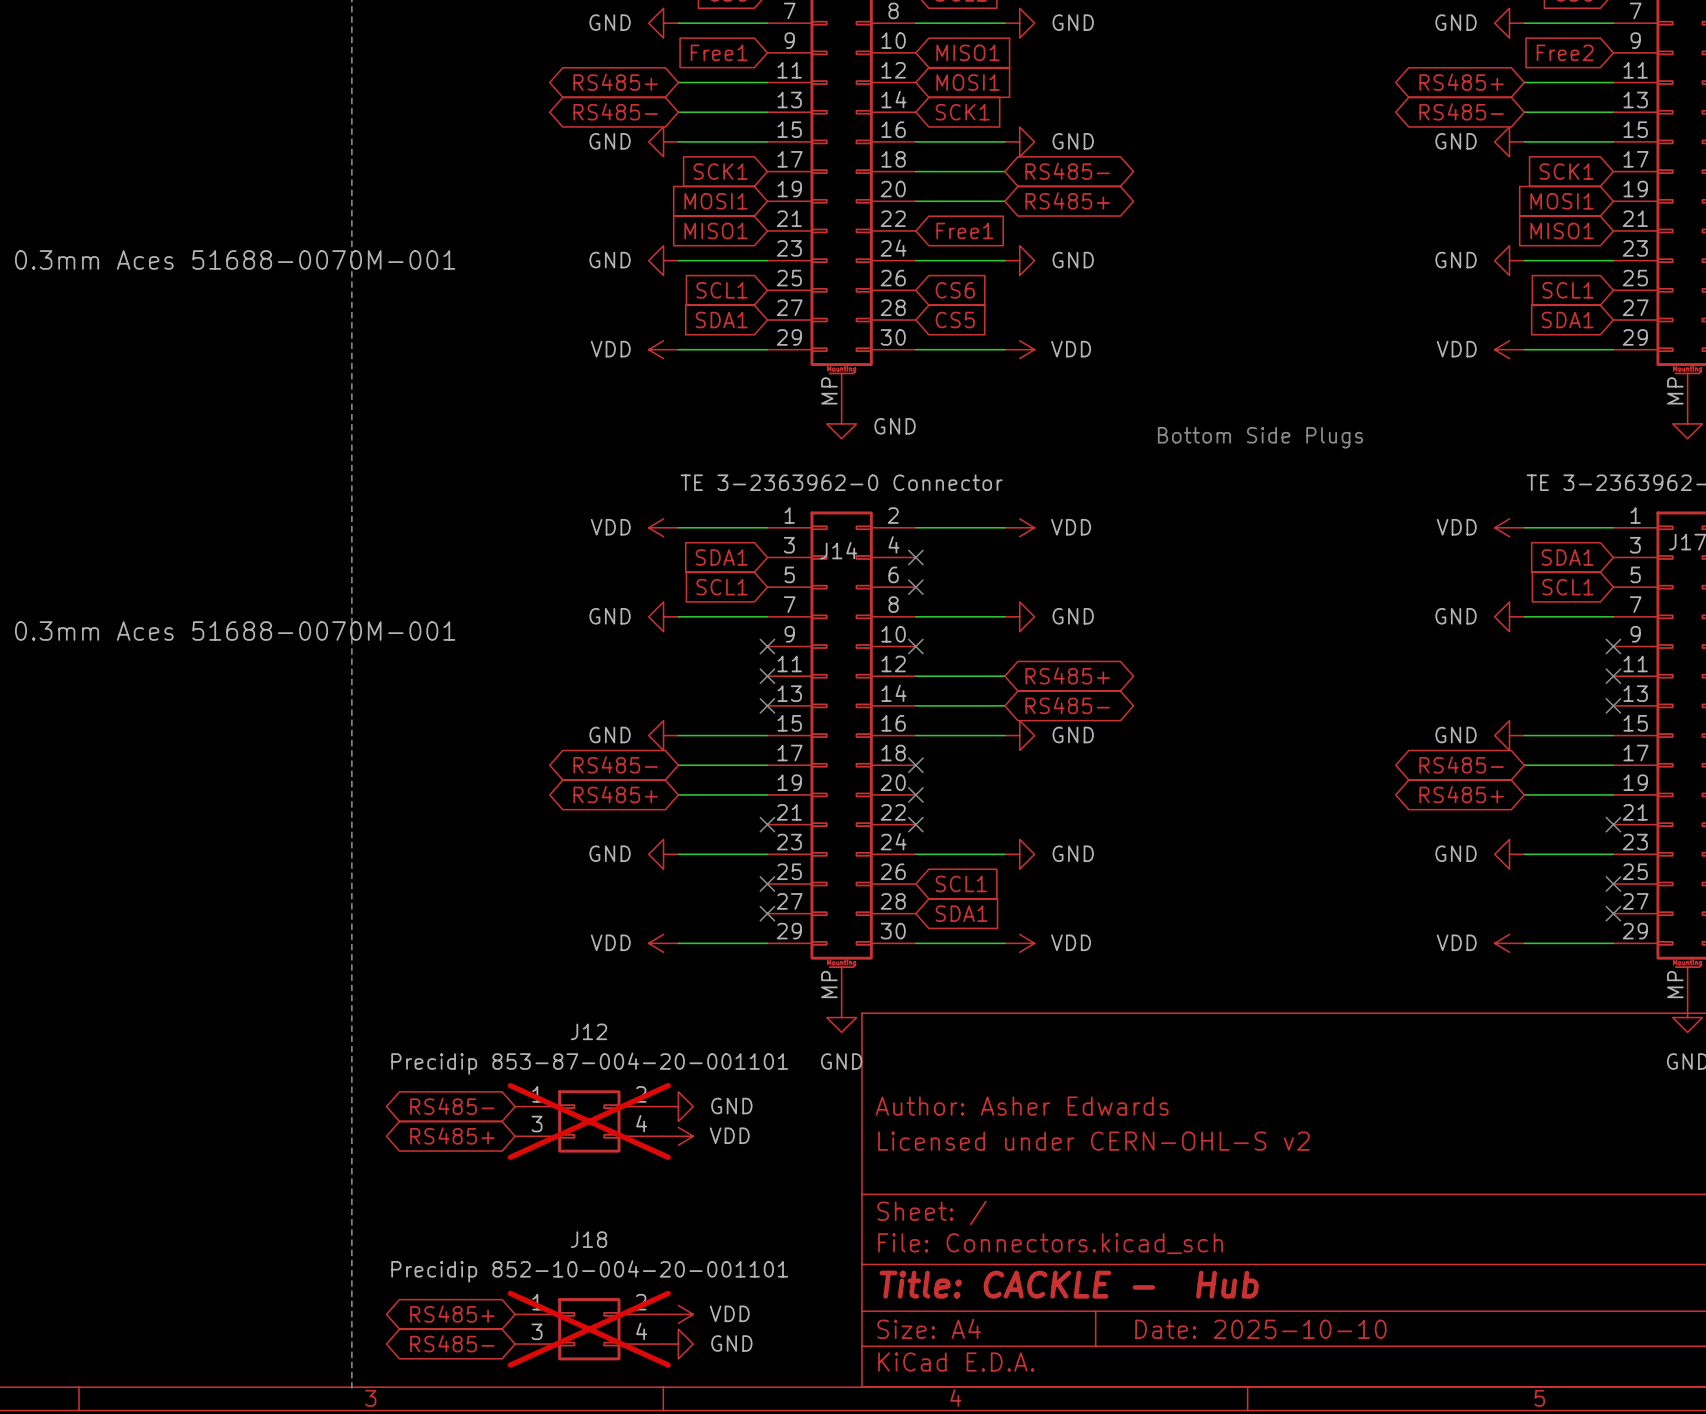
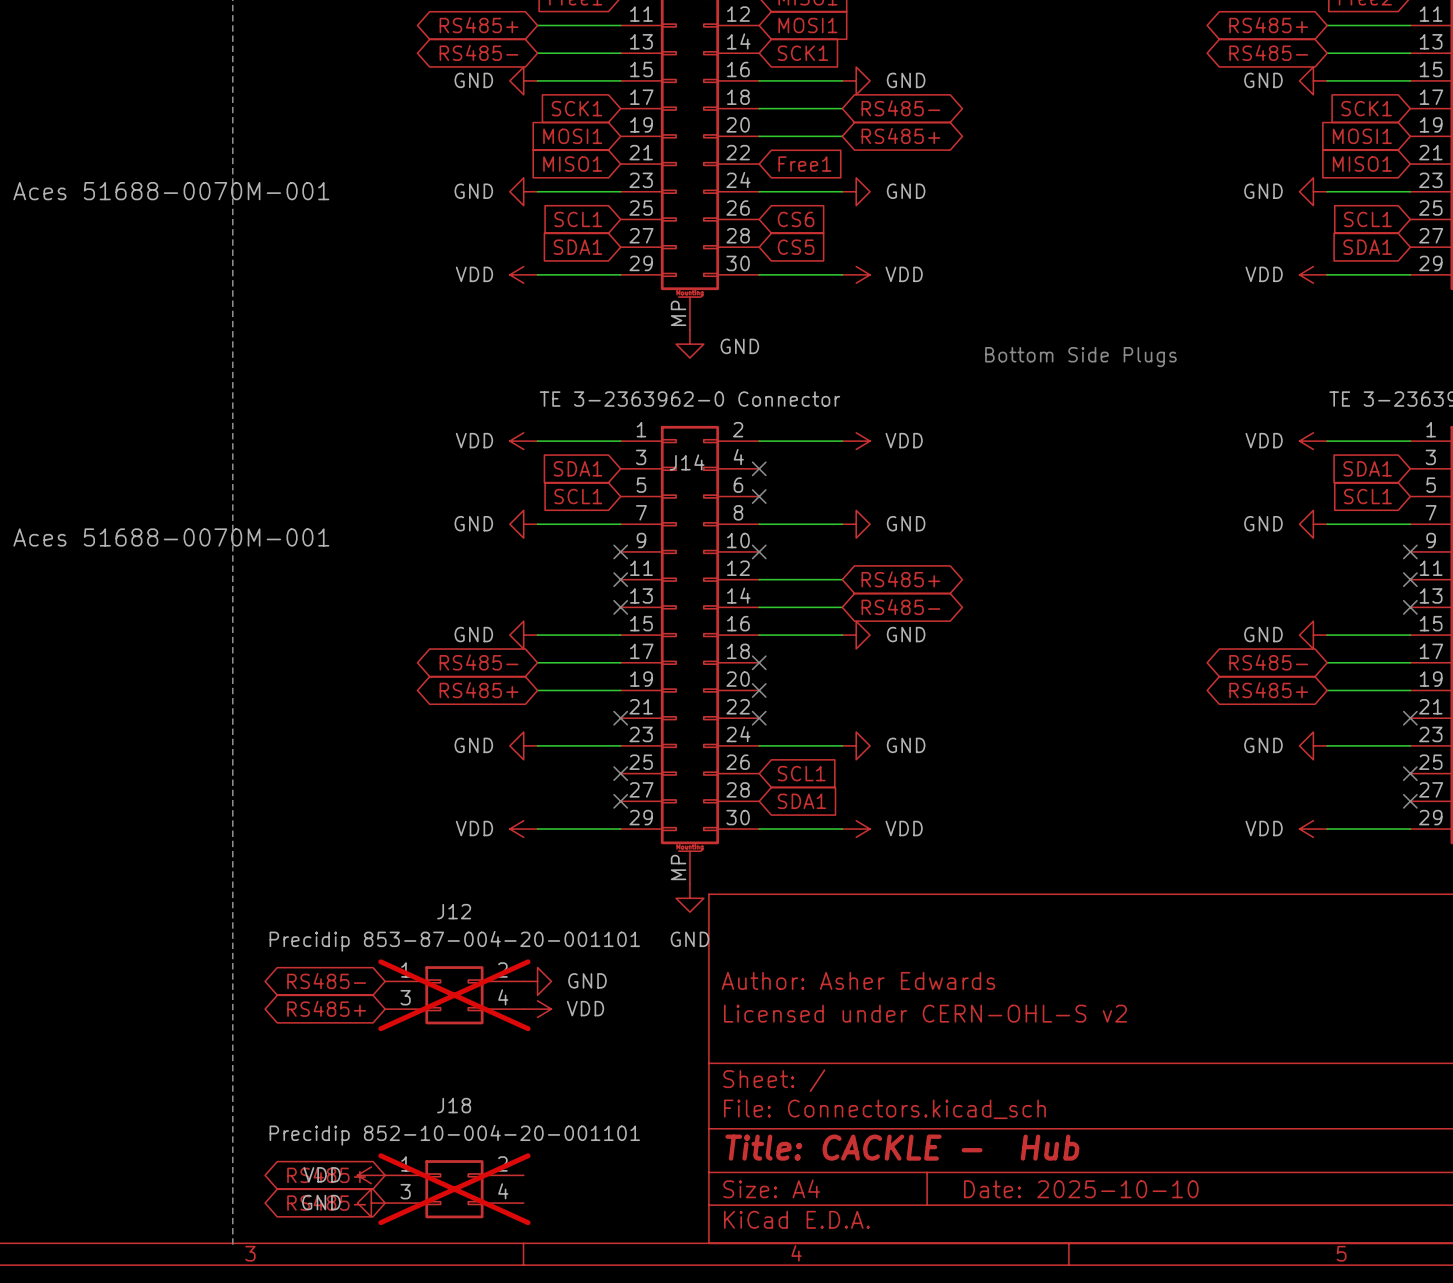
power symbol rotation: 0° (678, 1314) -> 180° (371, 1175)
power symbol position: VDD (678, 1314) -> VDD (371, 1175)
power symbol rotation: 0° (678, 1344) -> 180° (371, 1203)
power symbol position: GND (678, 1344) -> GND (371, 1203)

